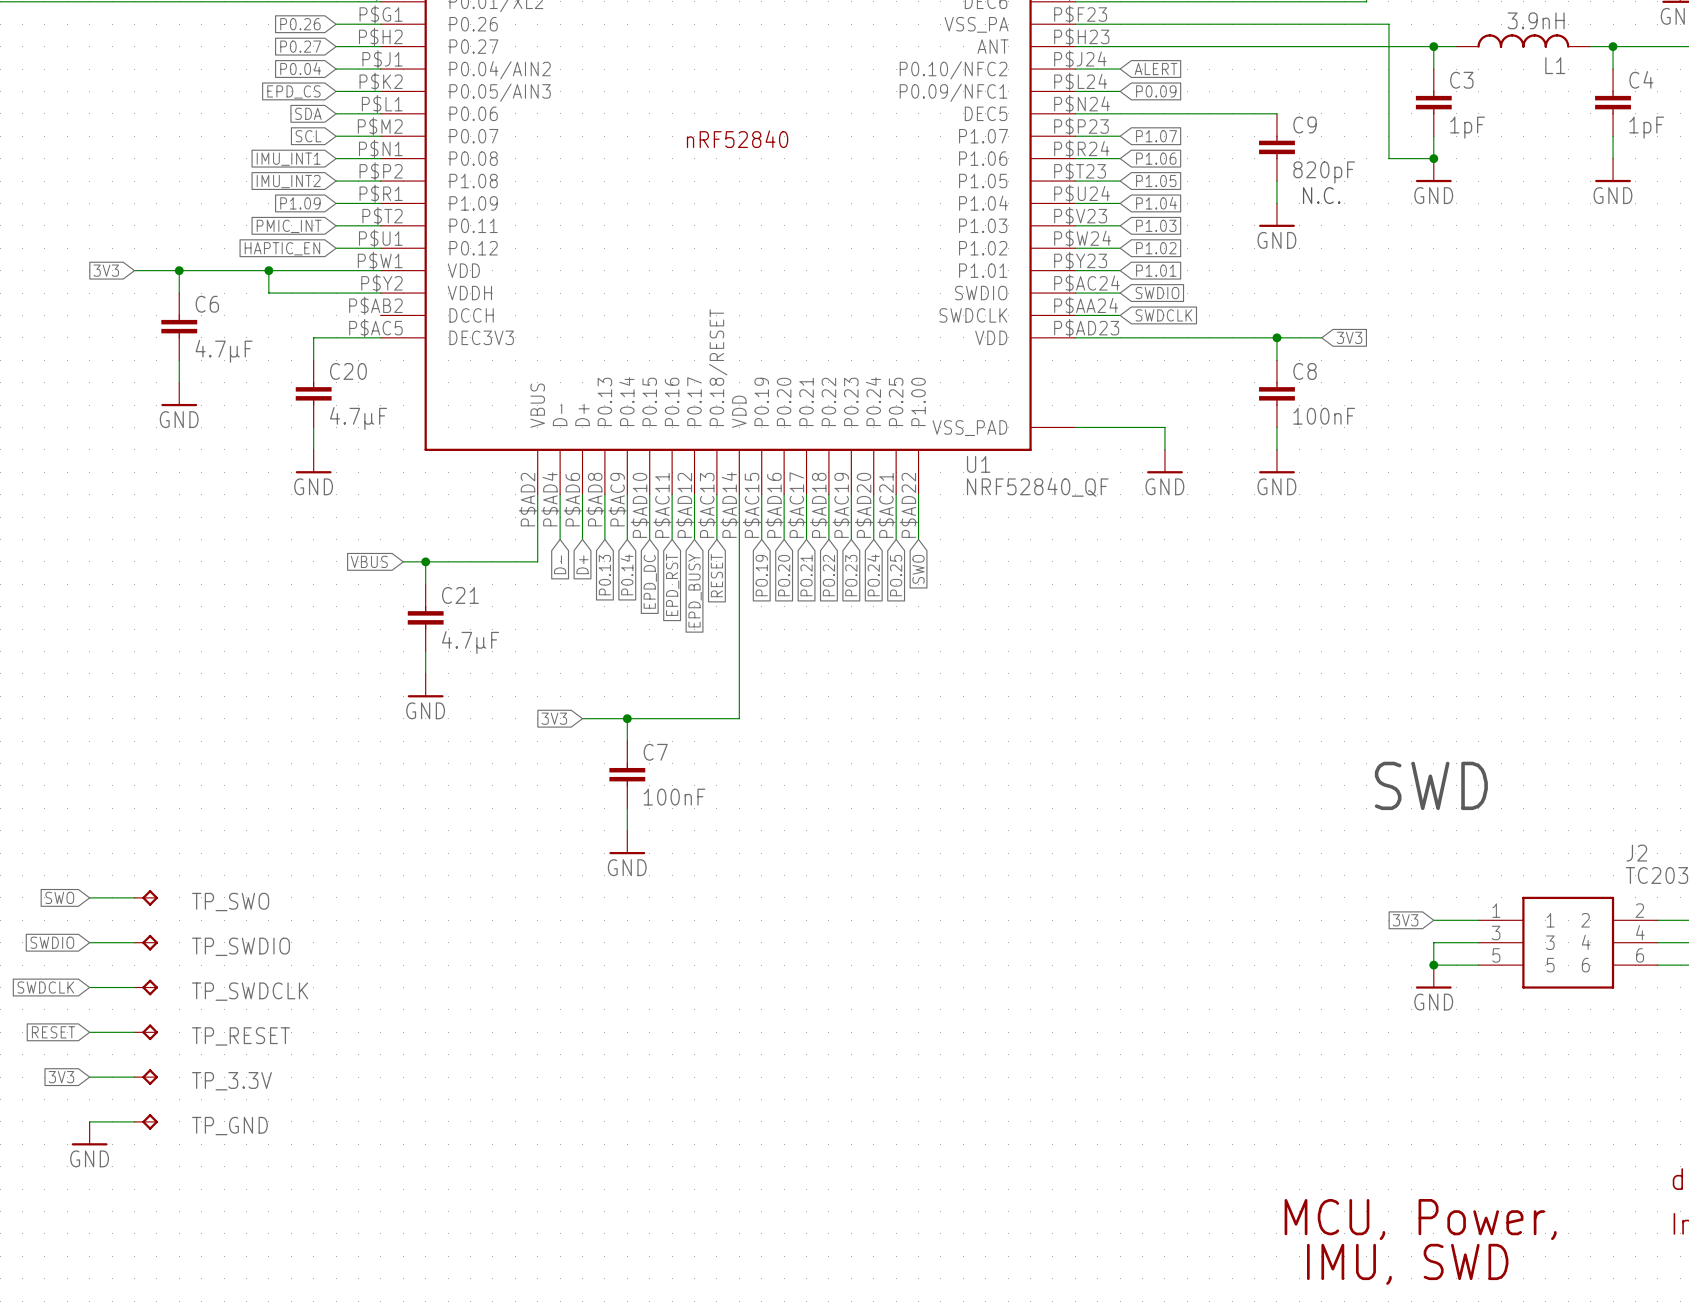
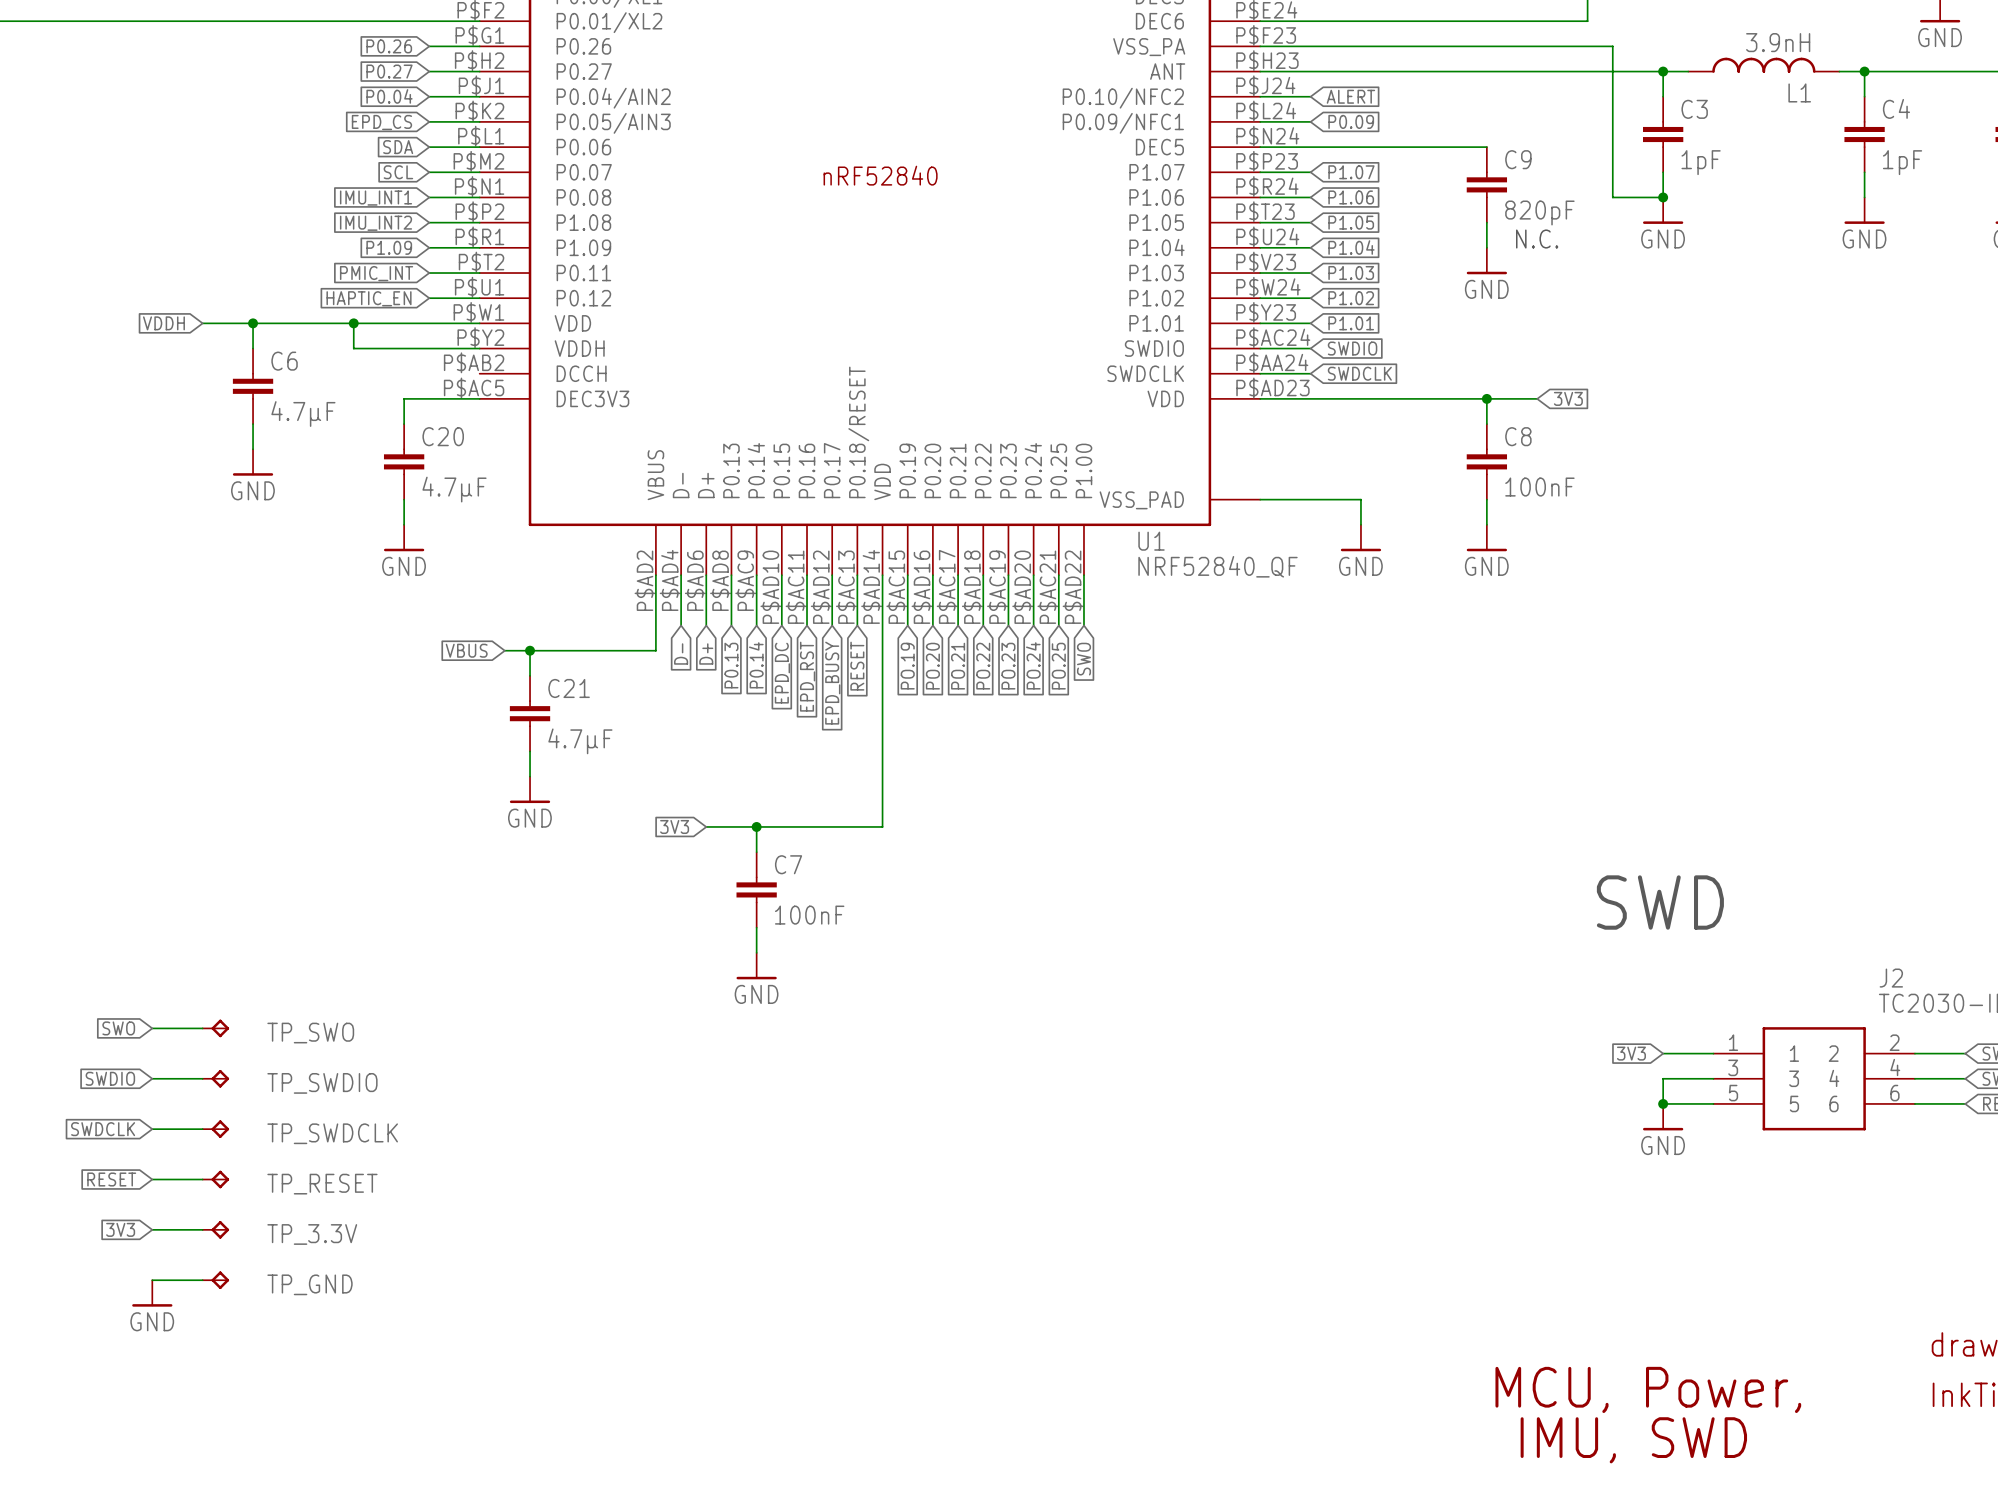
global label: 3V3 (106, 270) -> VDDH (163, 323)

